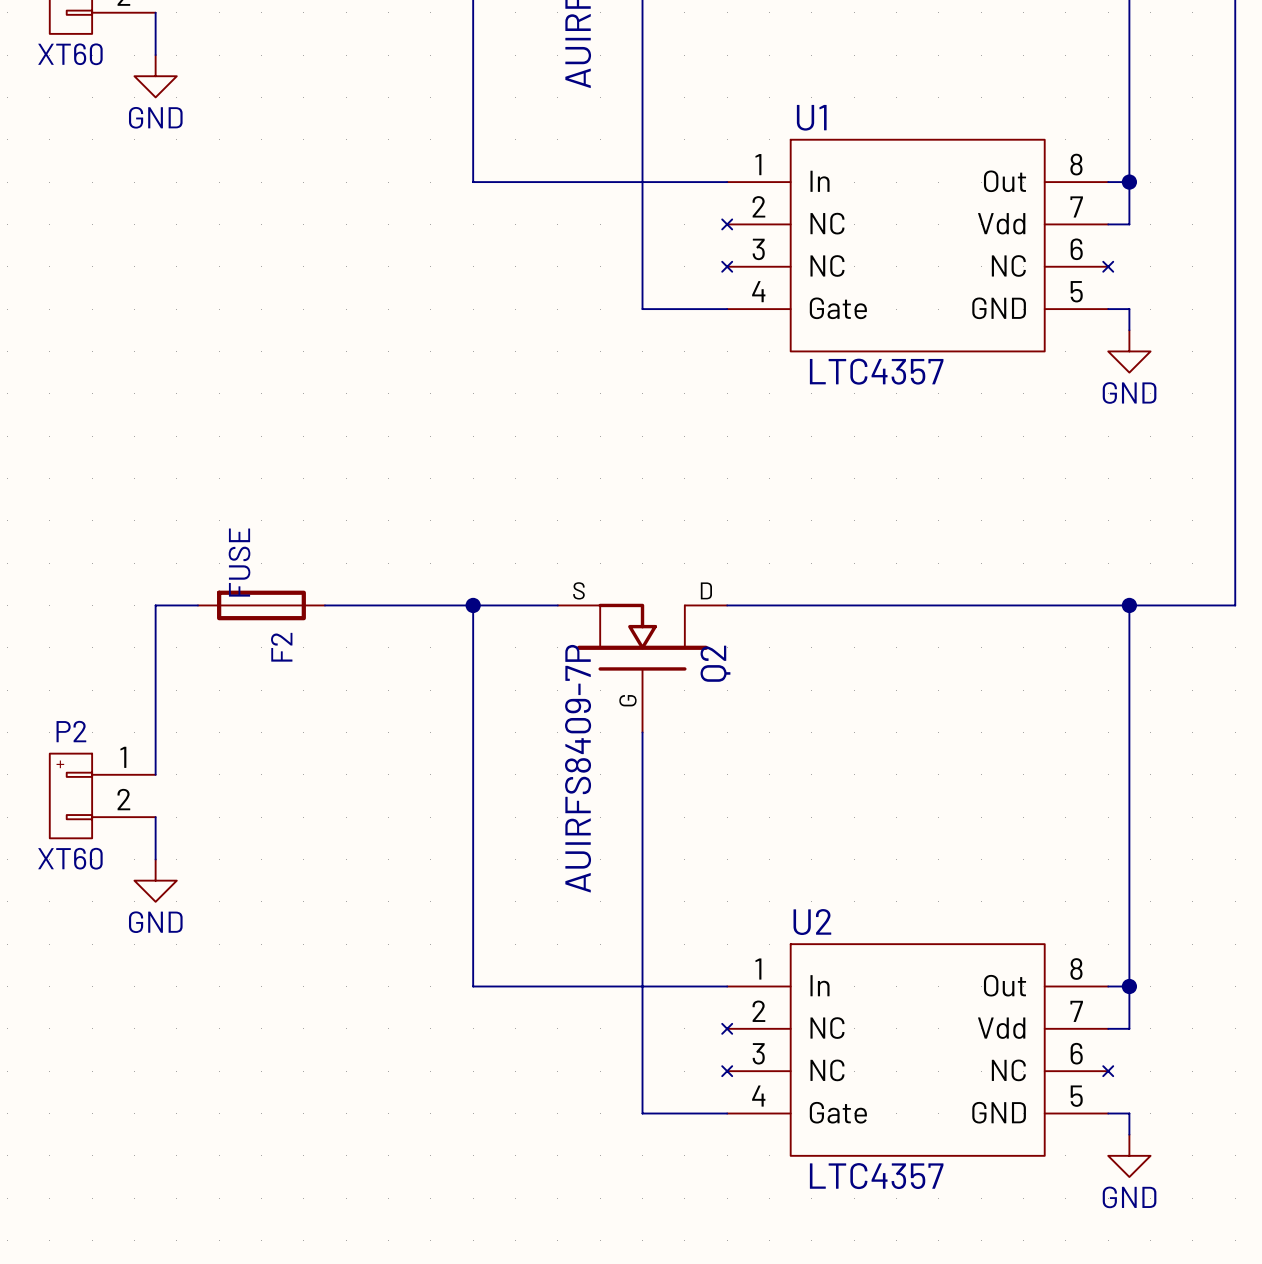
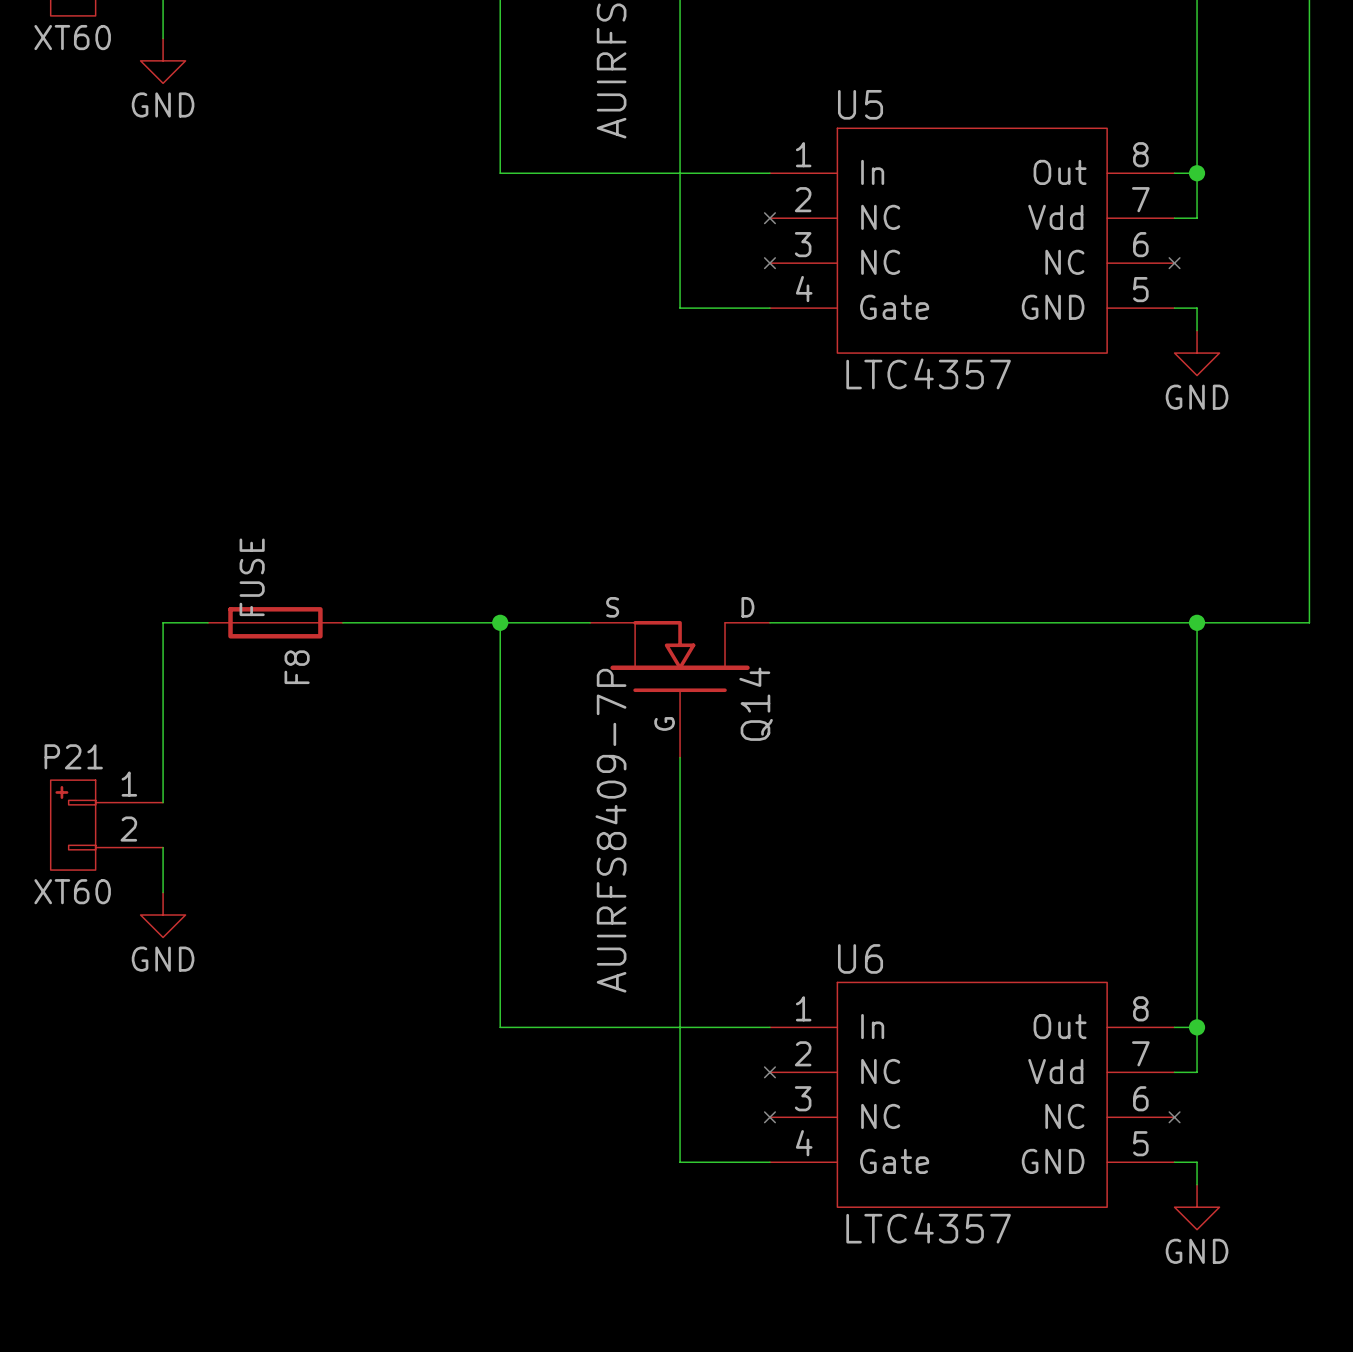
U1 name: U1 (811, 117) -> U5 (860, 104)
F2 name: F2 (281, 647) -> F8 (297, 667)
Q2 name: Q2 (715, 663) -> Q14 (756, 704)
P2 name: P2 (71, 731) -> P21 (73, 756)
U2 name: U2 (812, 922) -> U6 (860, 958)

